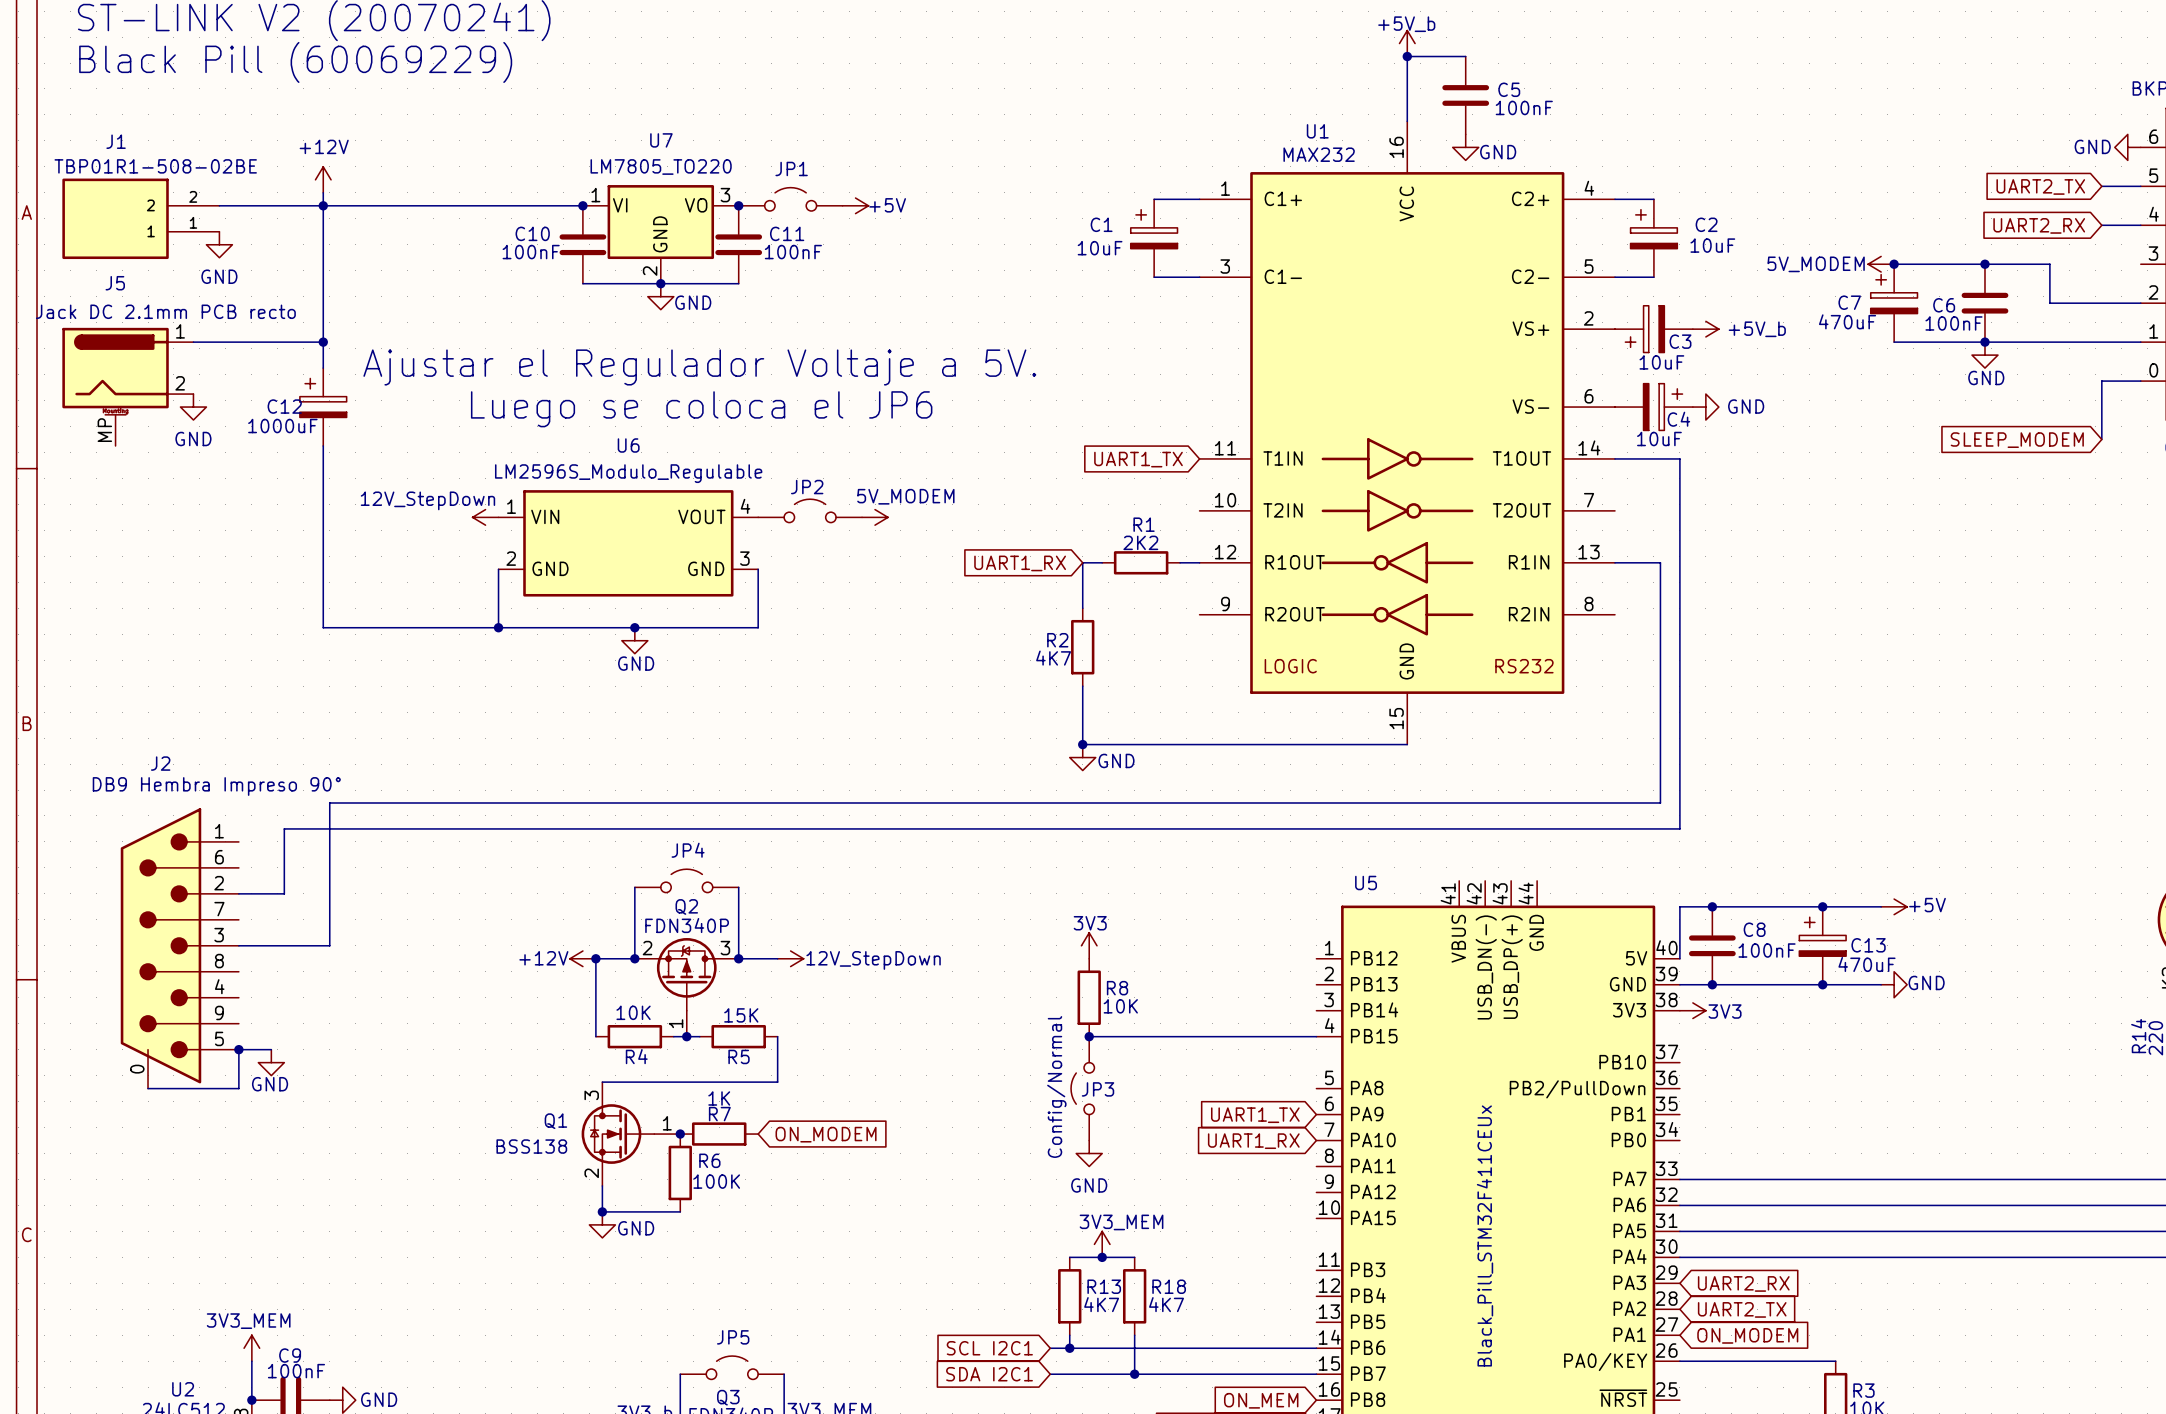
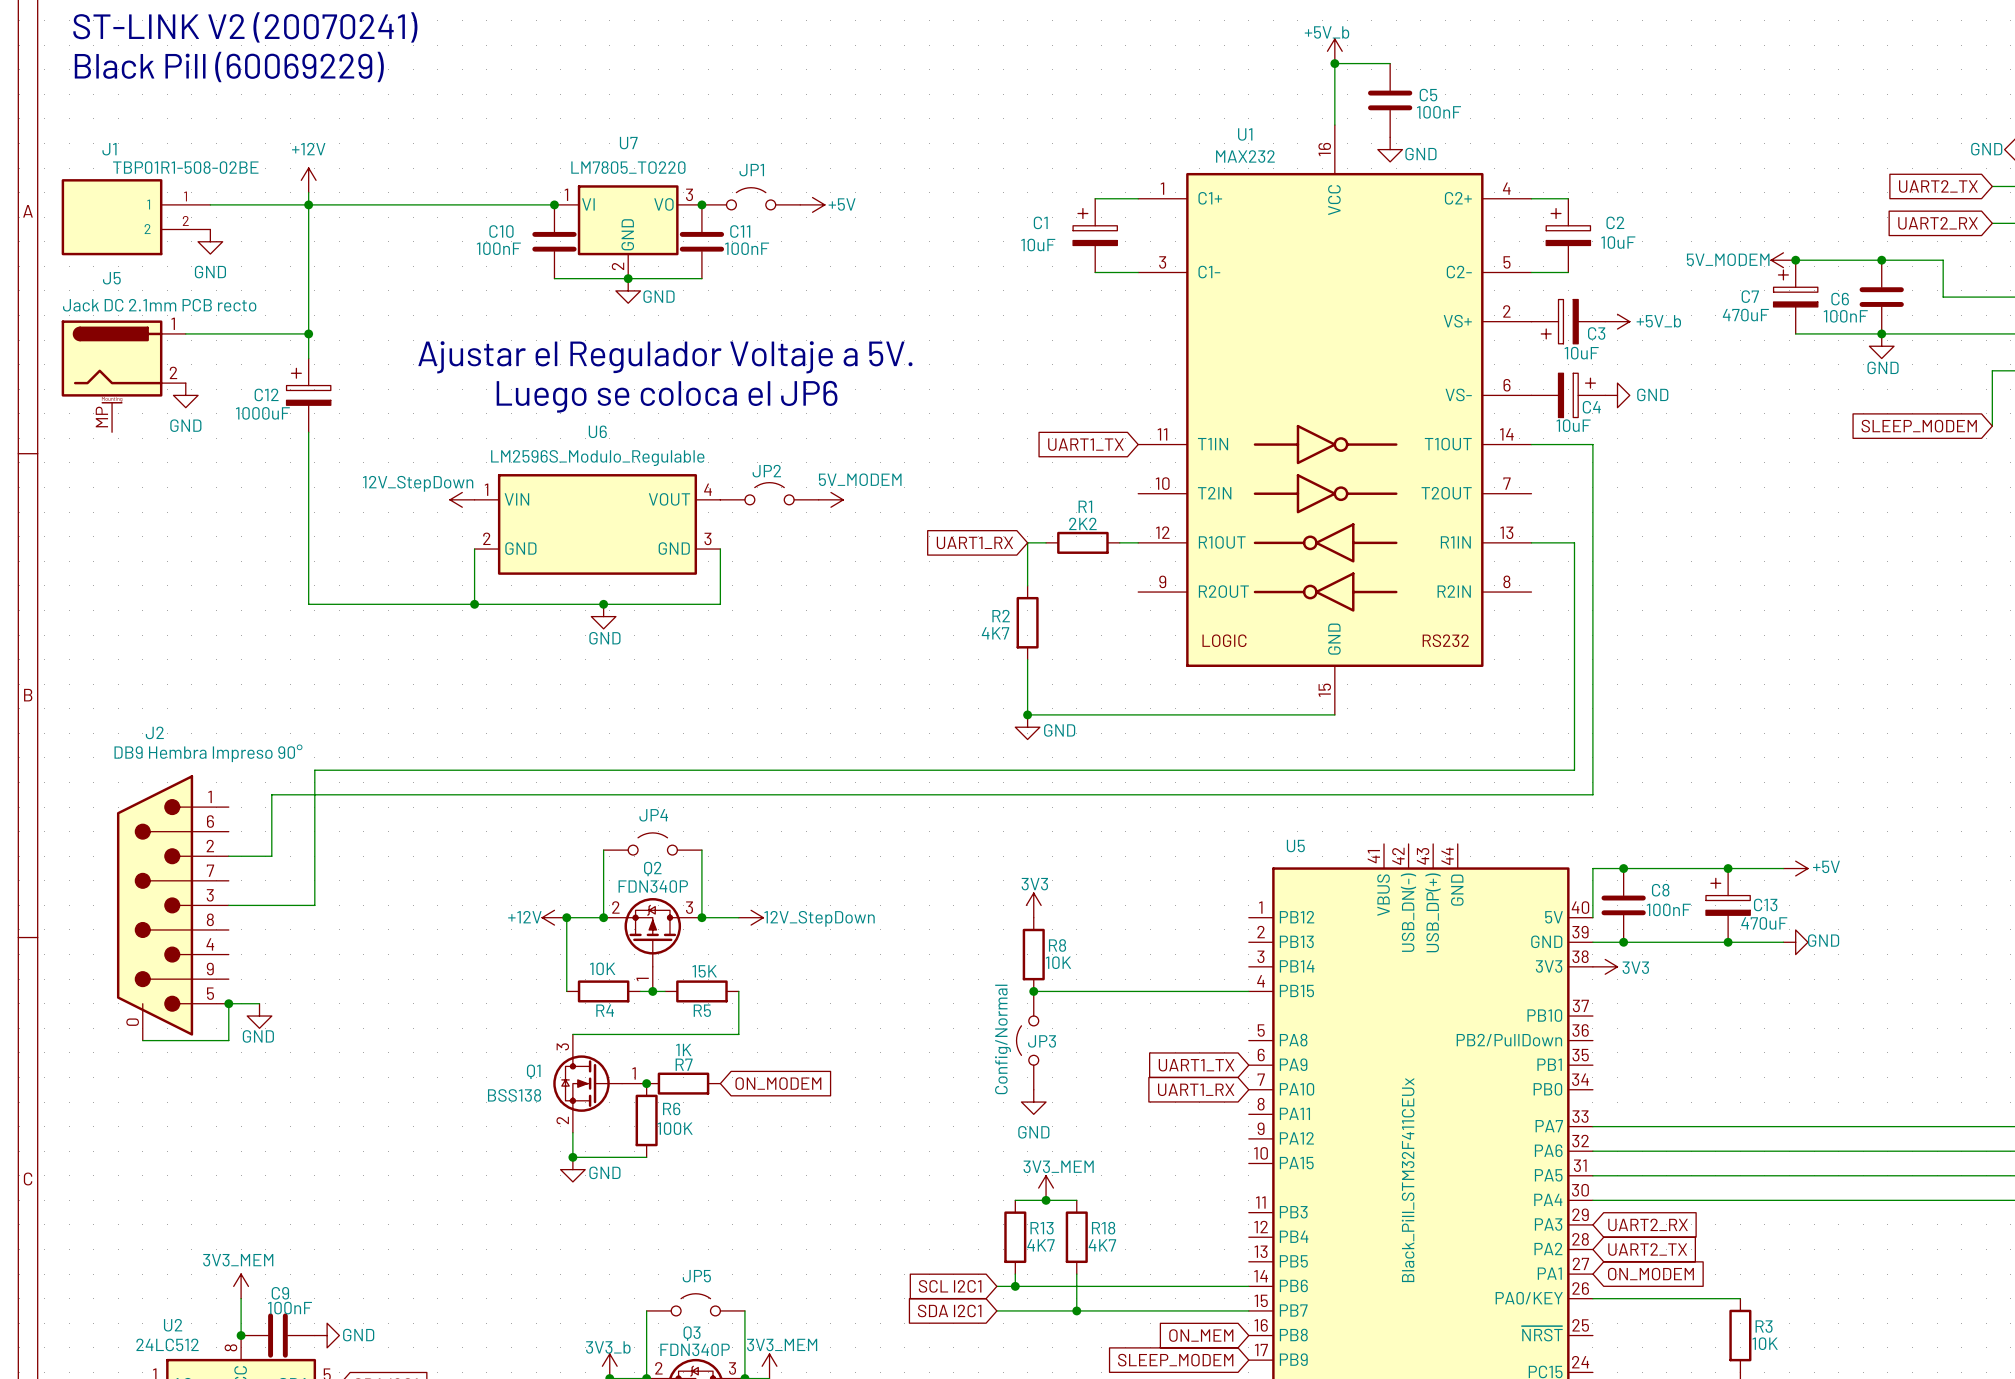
J1 flip: as is (115, 218) -> up-down (112, 217)

